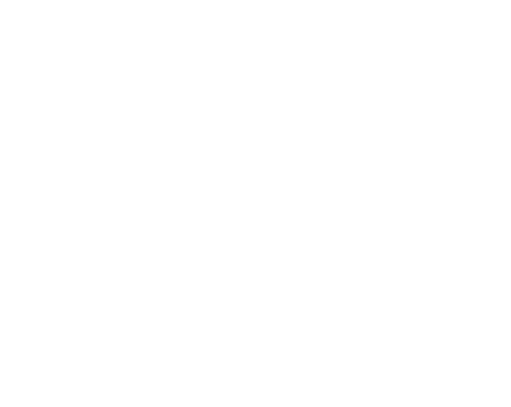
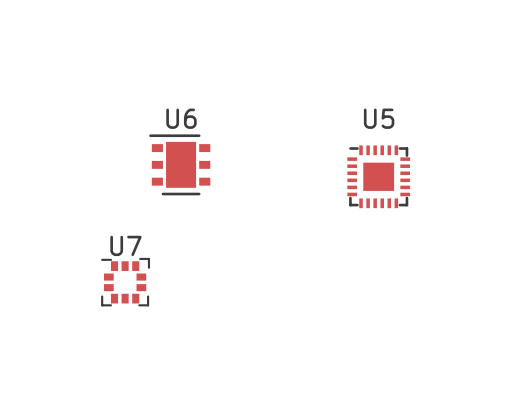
U6: none -> (179, 164)
U5: none -> (378, 176)
U7: none -> (125, 282)

